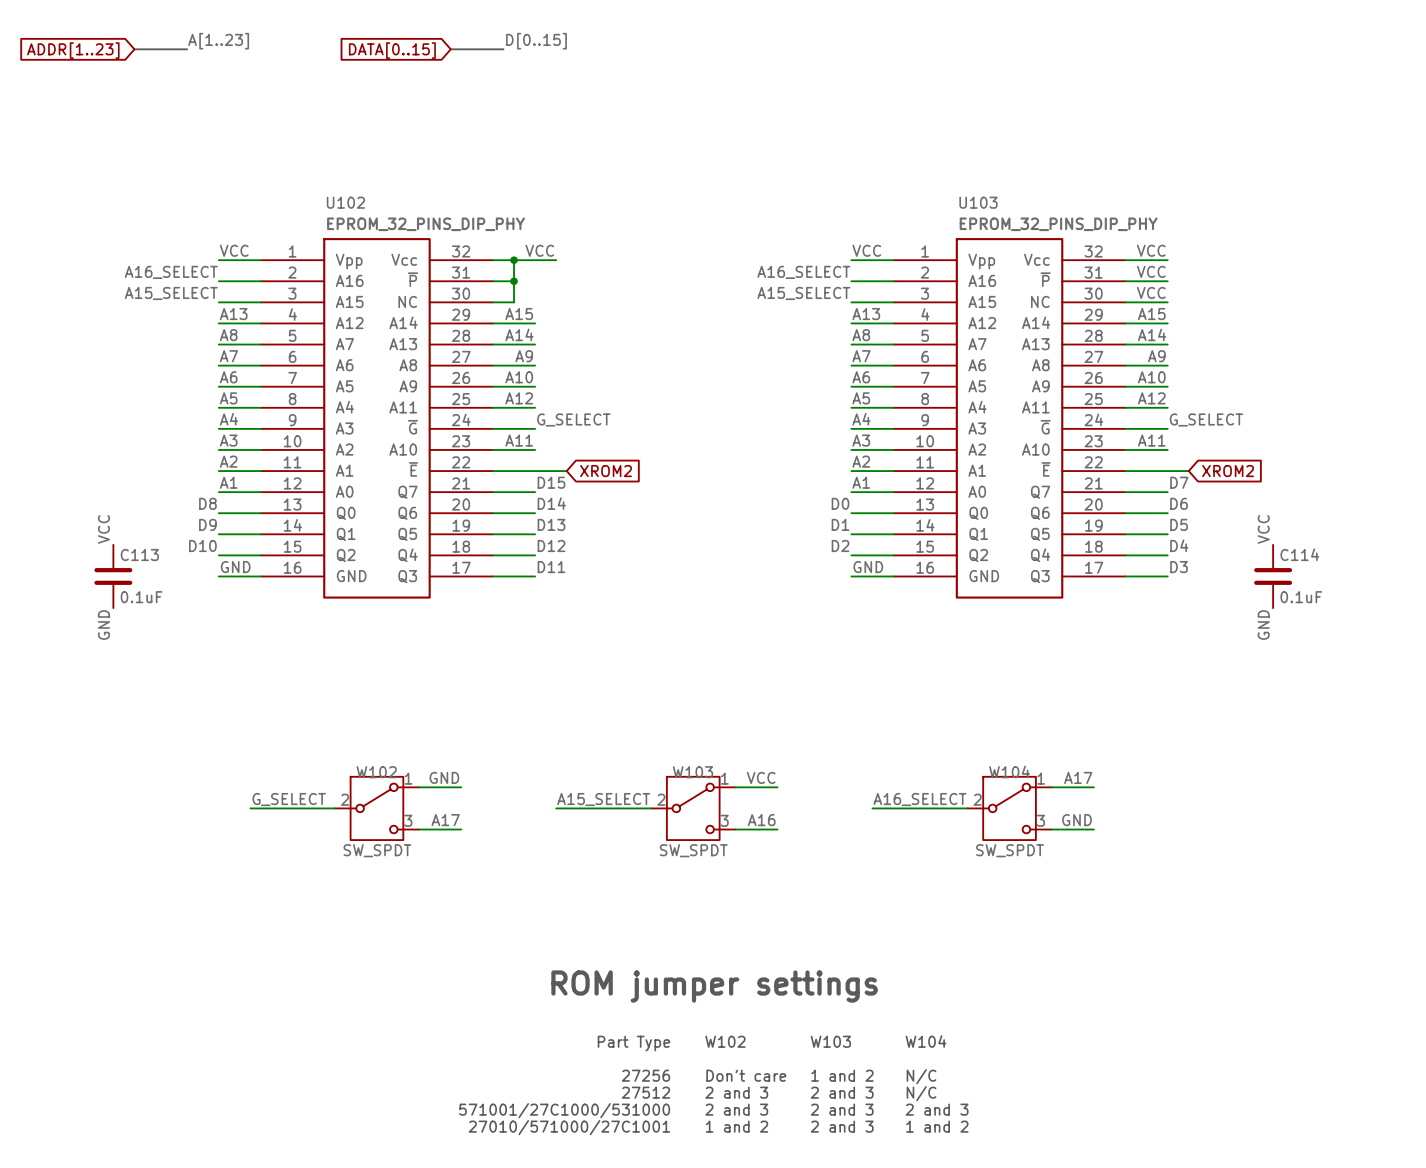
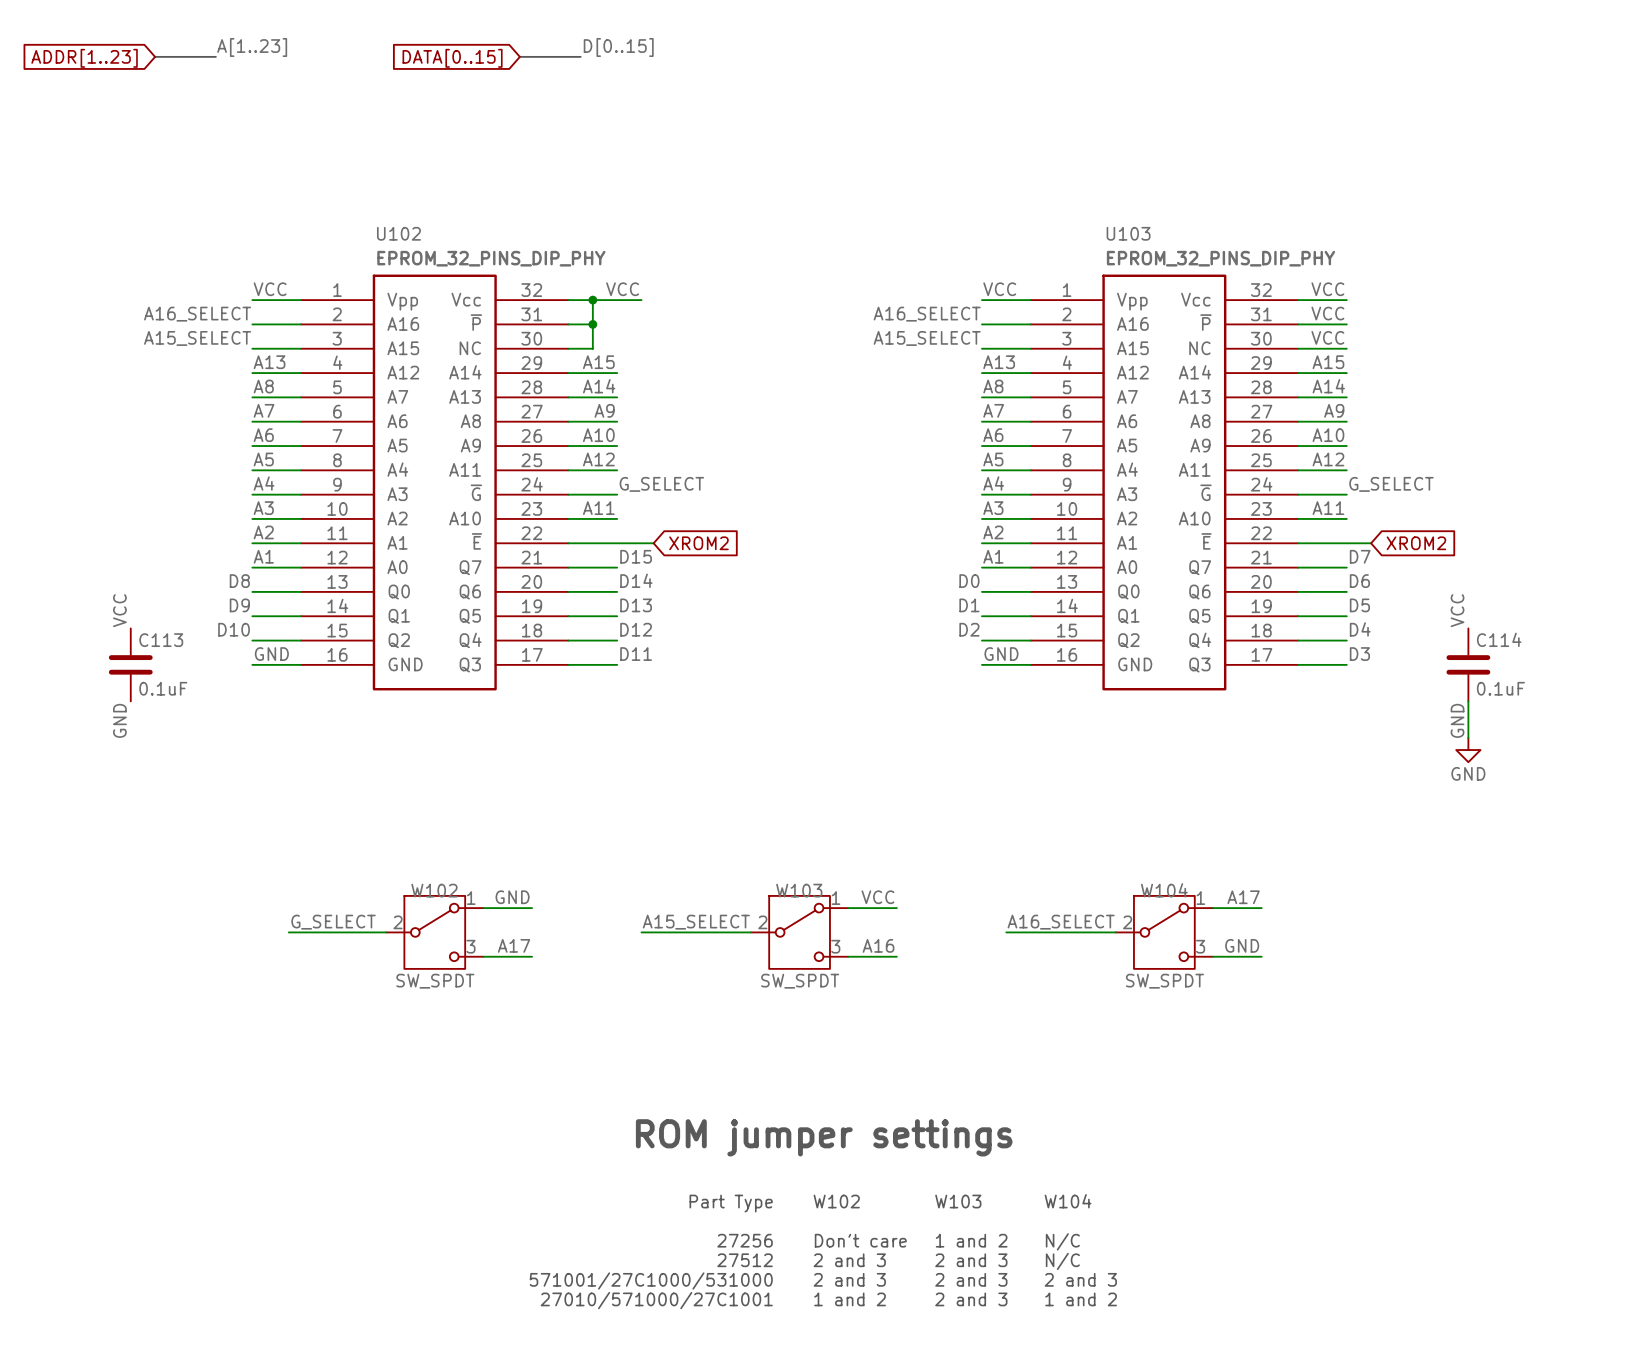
wire: none -> (1468, 701) (1468, 737)
power symbol: none -> GND (1468, 750)

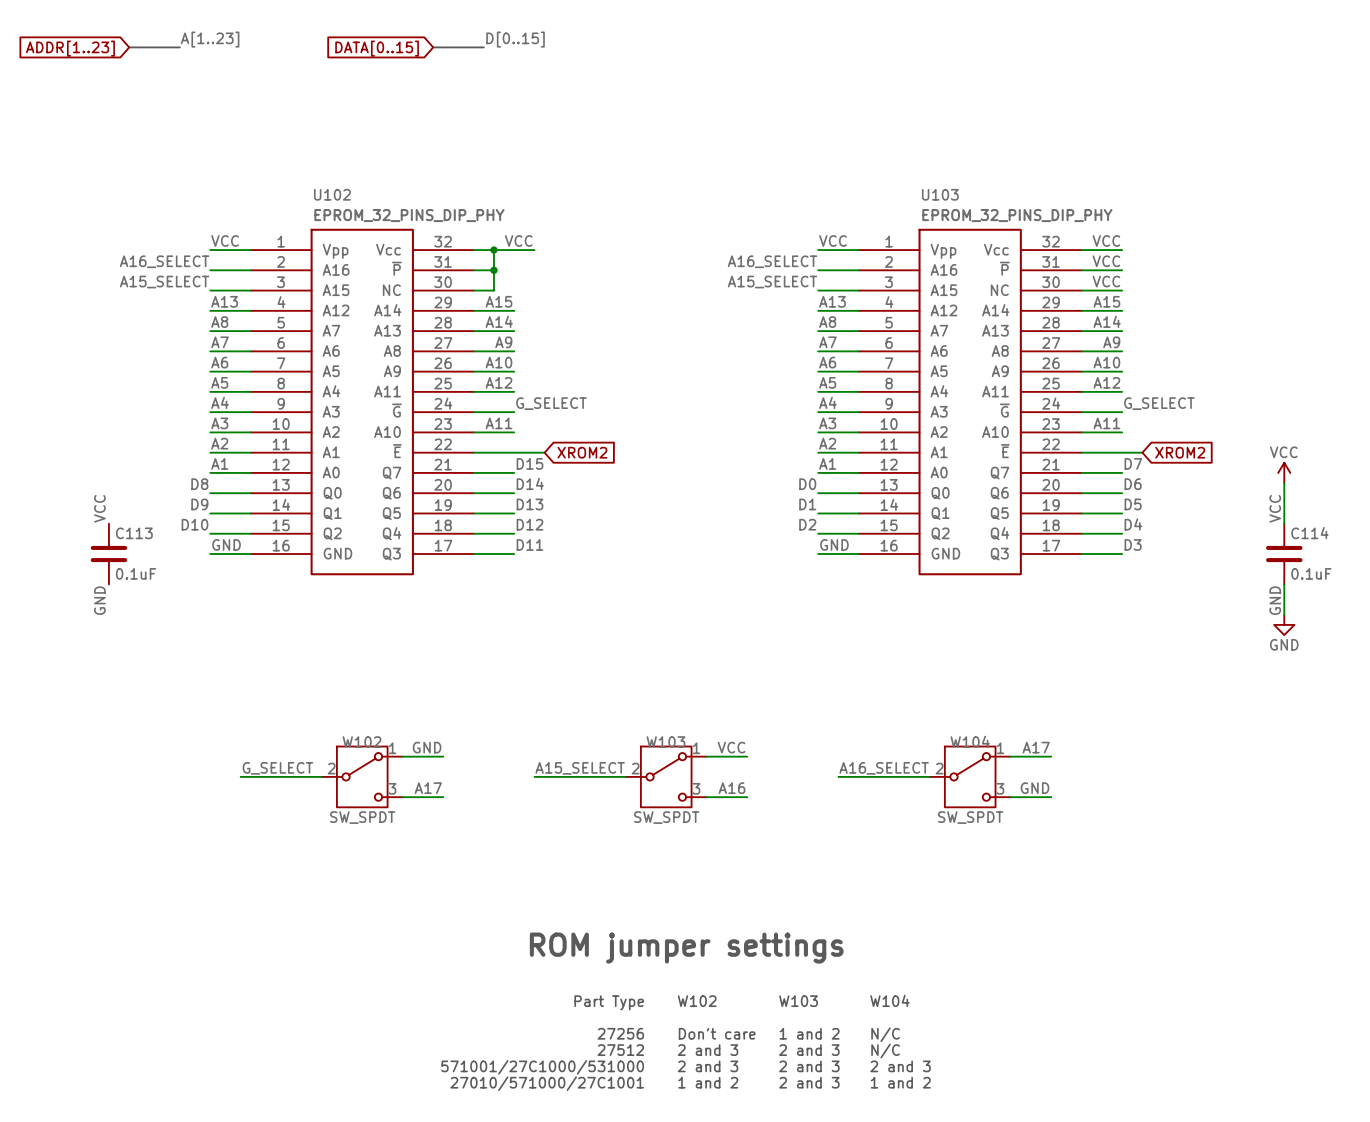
power symbol: none -> VCC (1284, 472)
wire: none -> (1284, 483) (1284, 523)
label position: VCC (1457, 610) -> VCC (1275, 508)
C114 position: (1468, 664) -> (1284, 554)
wire: (1468, 701) (1468, 737) -> (1284, 584) (1284, 614)
label position: GND (1457, 720) -> GND (1275, 600)
power symbol position: GND (1468, 750) -> GND (1284, 624)

